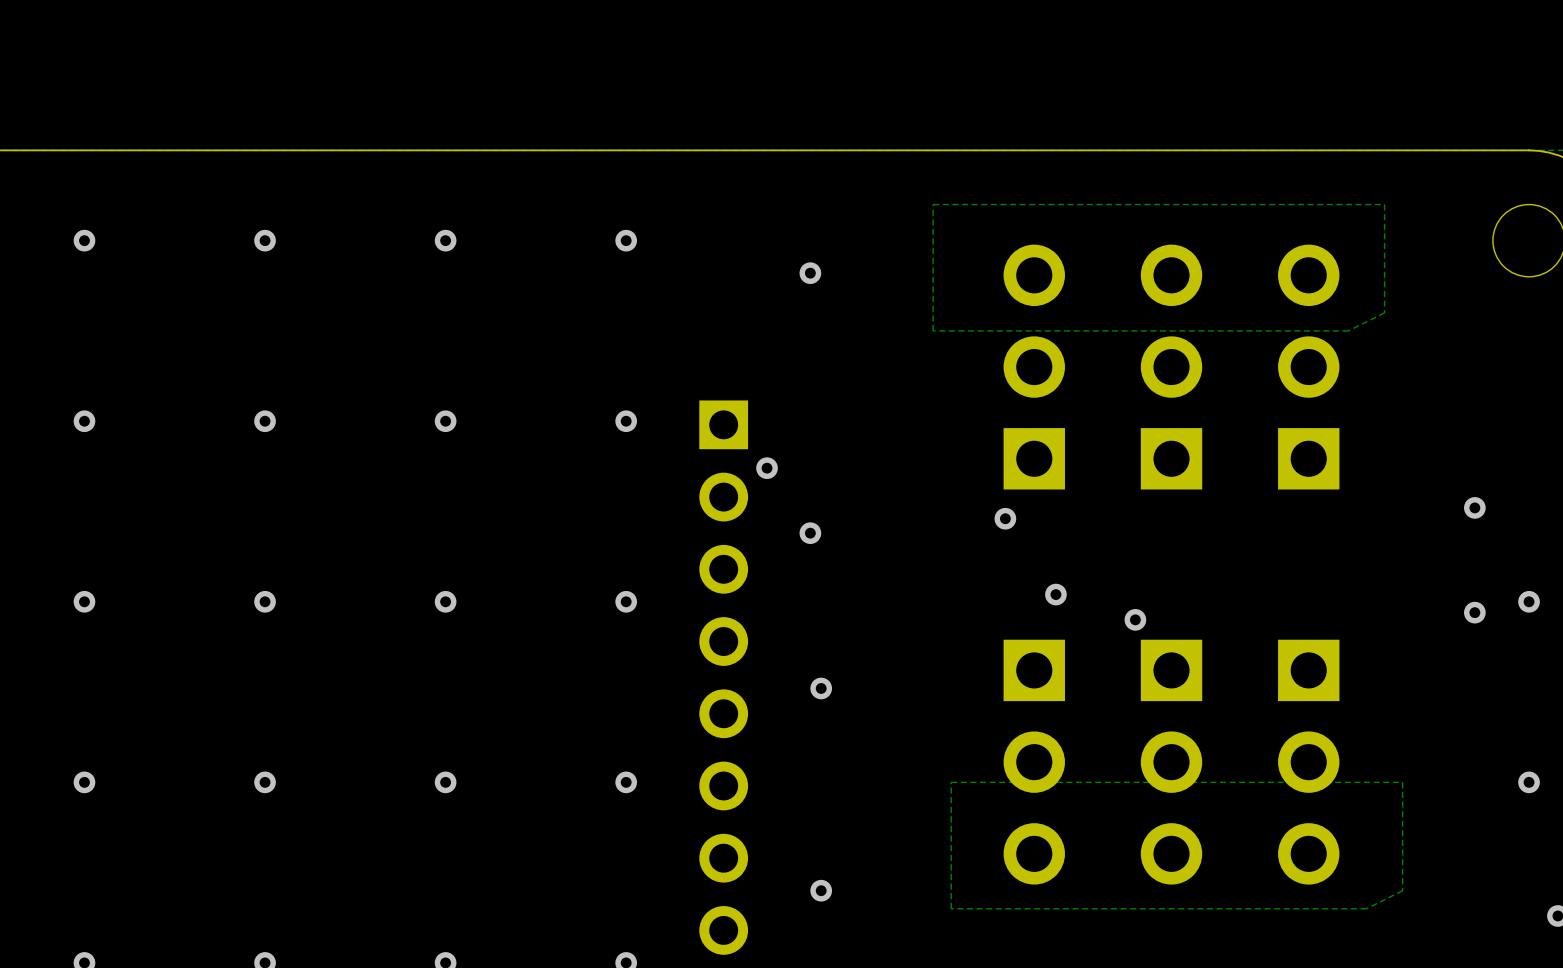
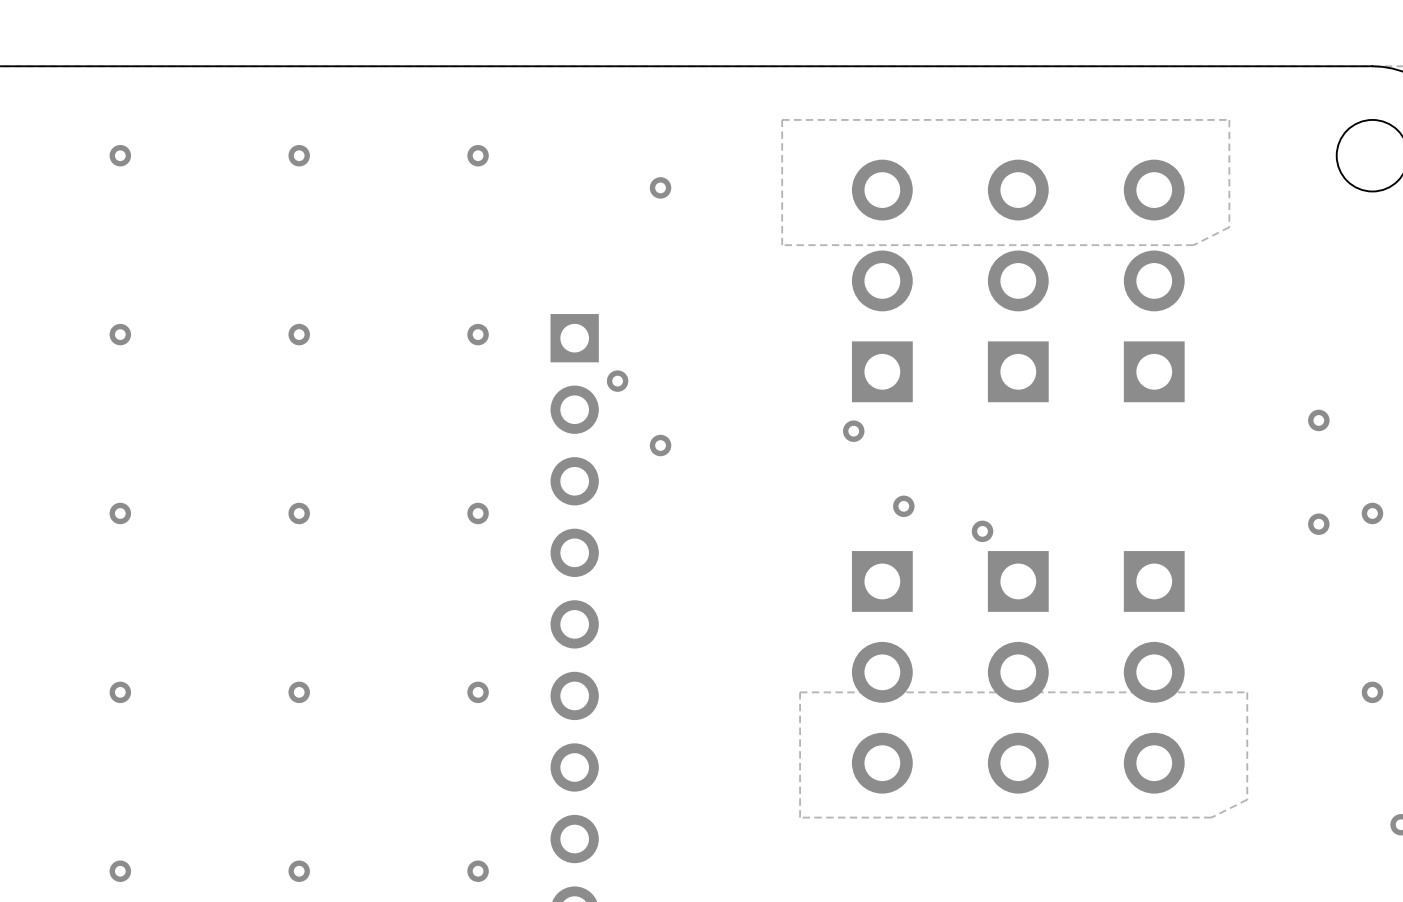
via: (821, 688) -> none
via: (821, 890) -> none

